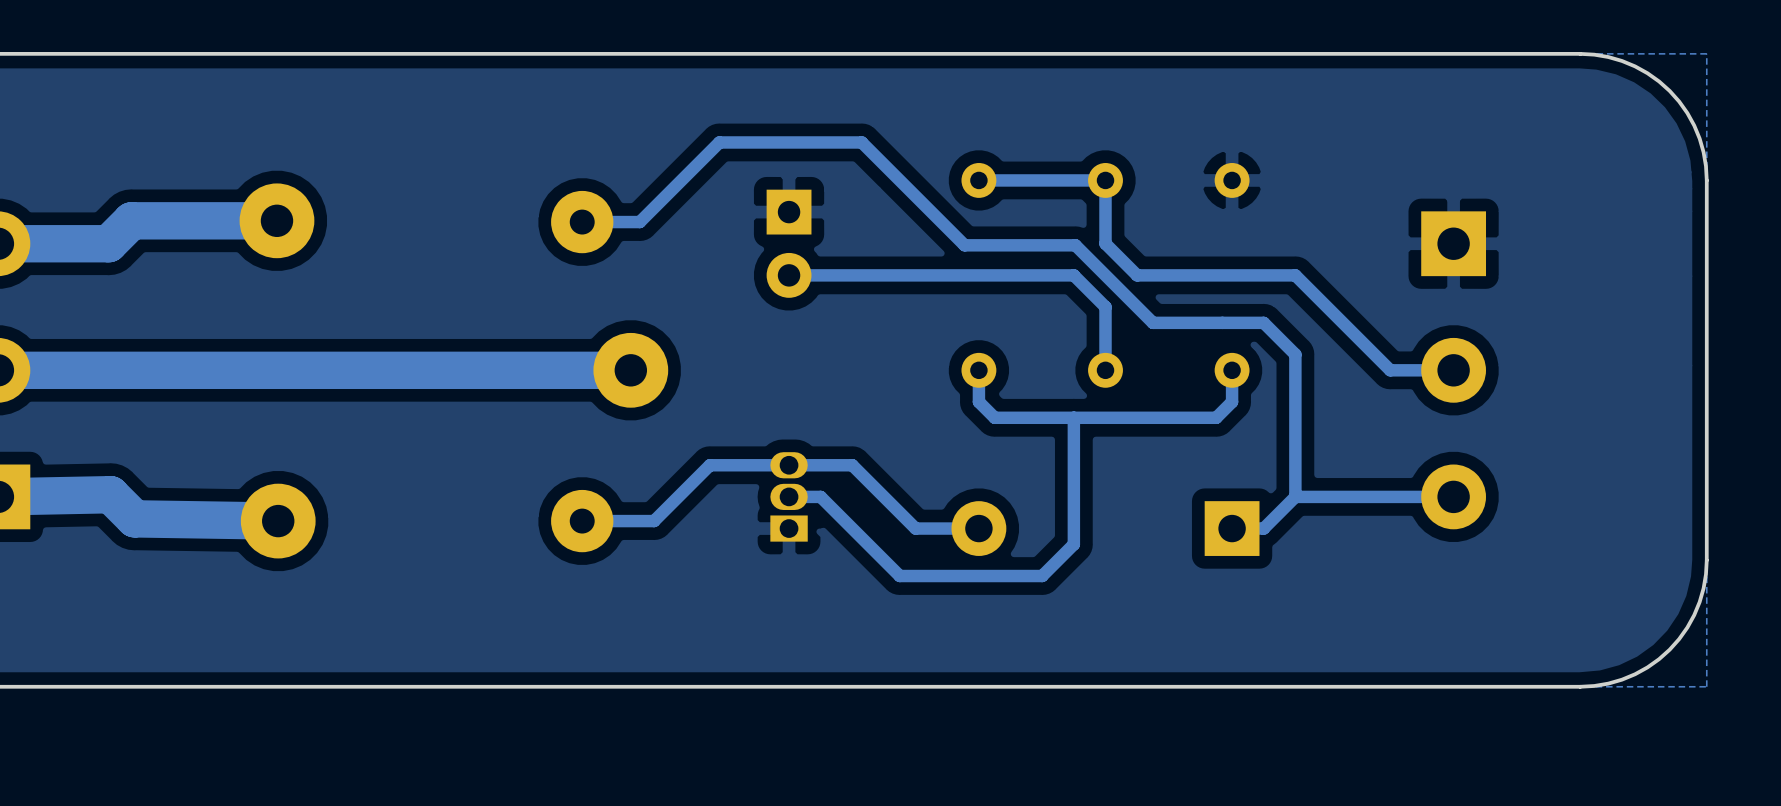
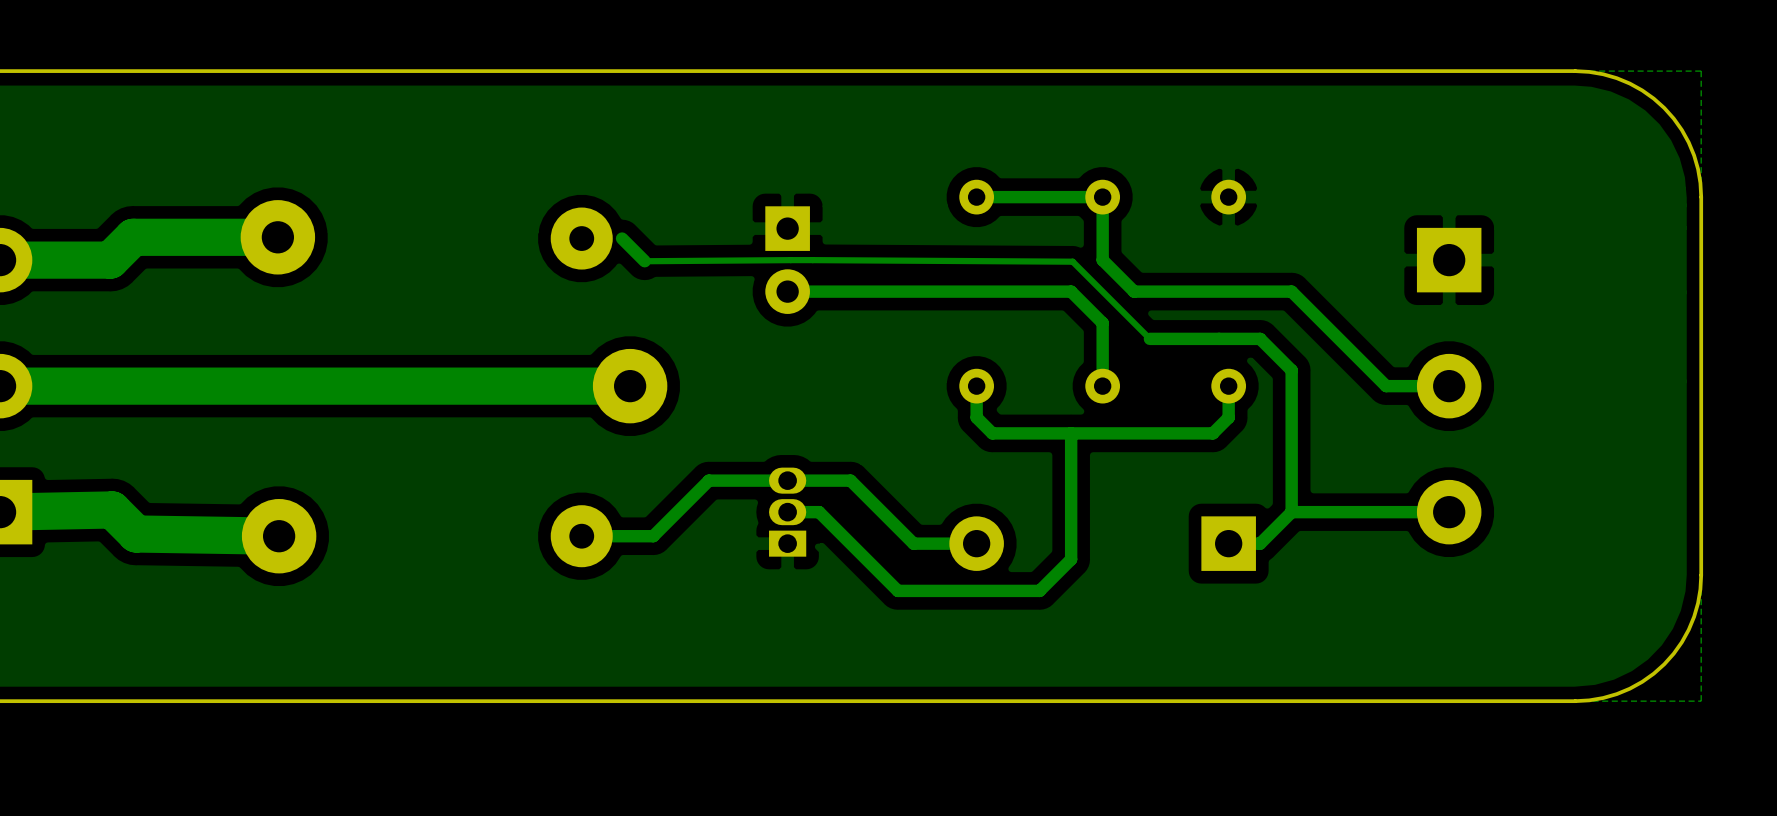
track: (582, 222) (639, 222) (719, 142) (861, 142) (964, 245) (1075, 245) -> (622, 238) (644, 261) (1072, 261)
track width: thick (1075, 245) (1152, 322) -> thin (1072, 261) (1149, 338)

